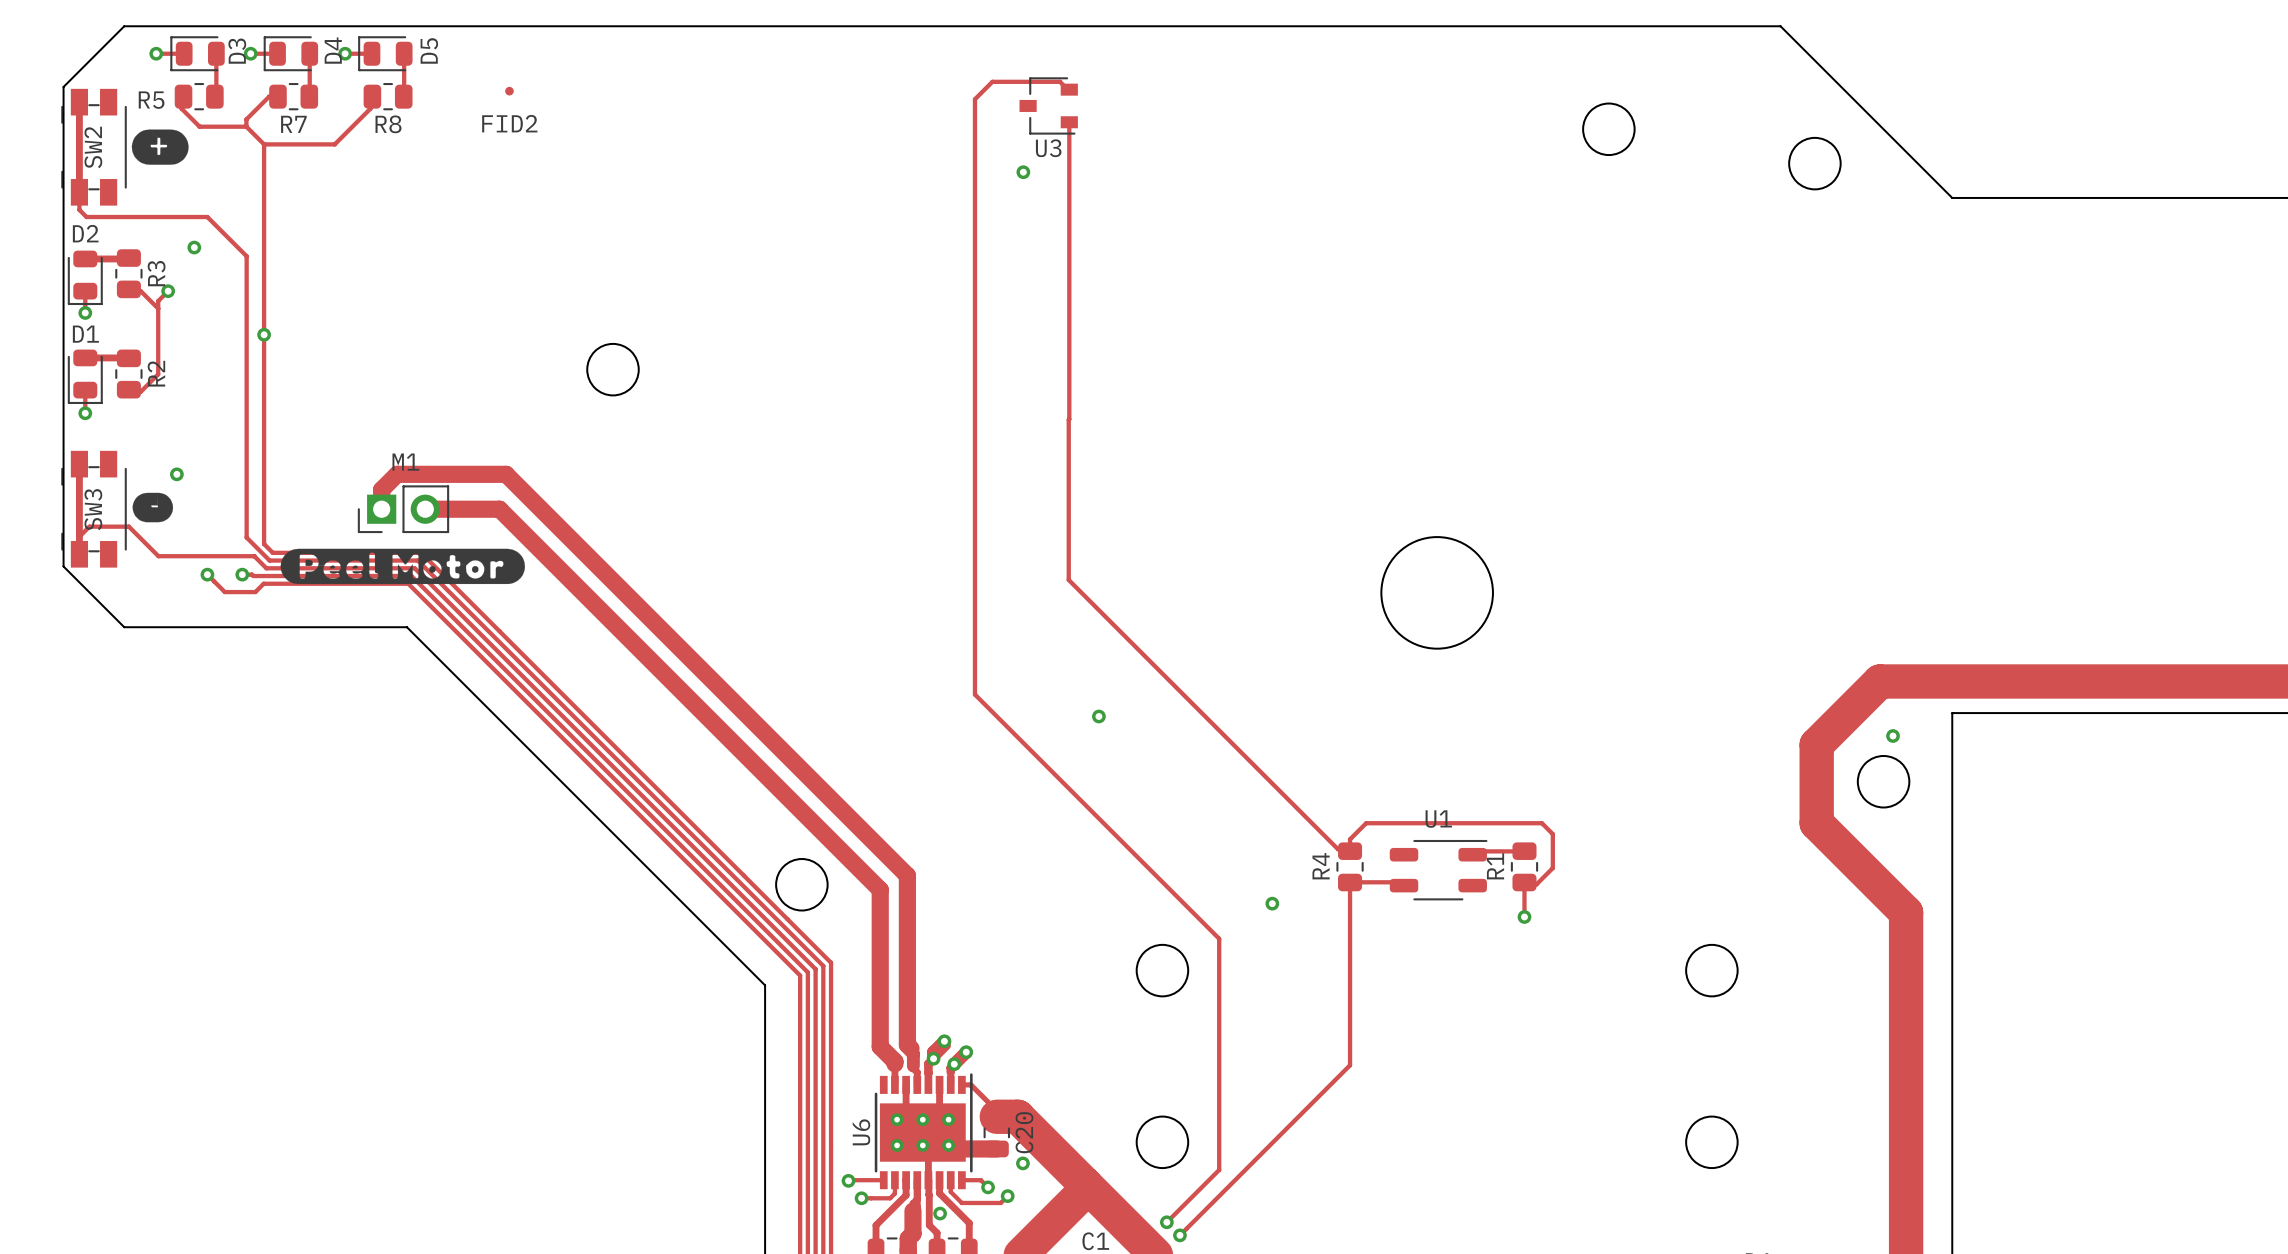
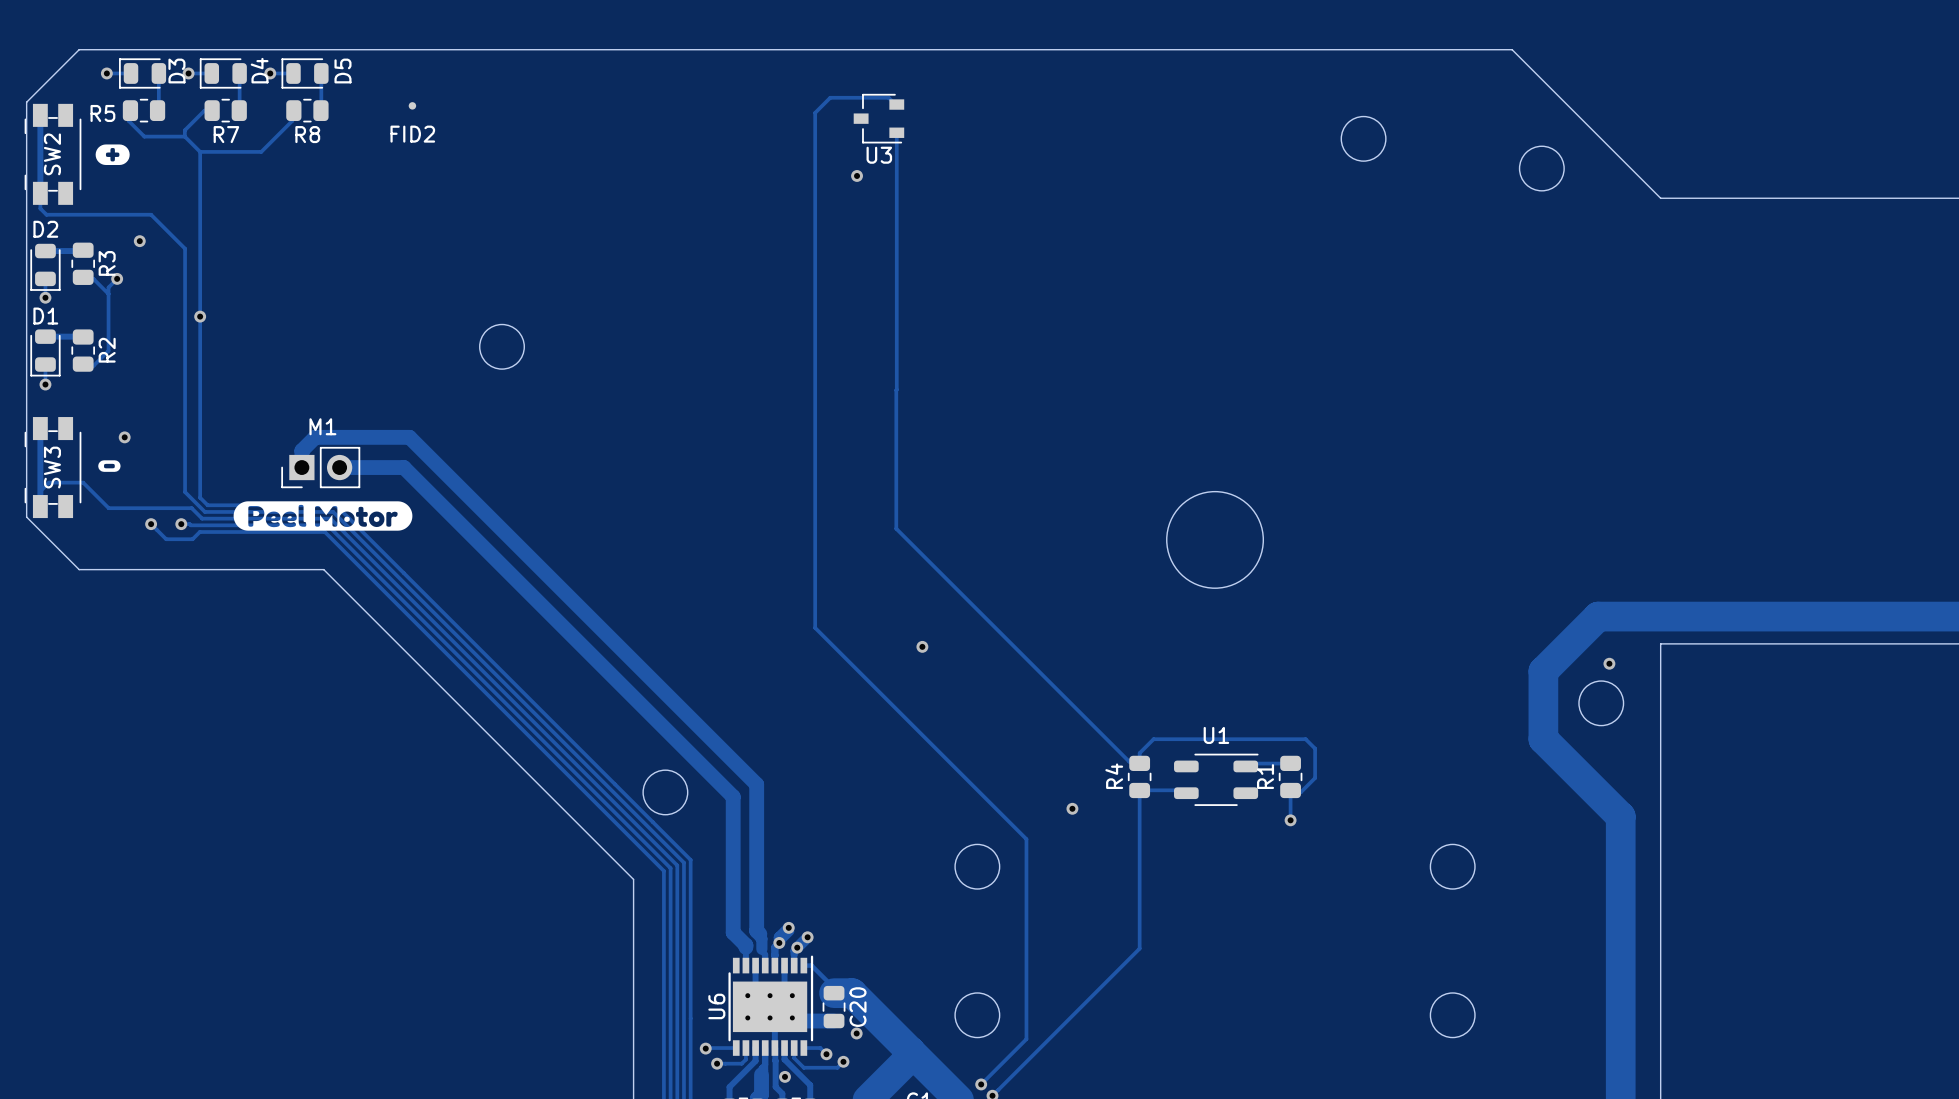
drawing shape: [131, 129, 189, 165] -> [95, 144, 130, 166]
drawing shape: [132, 492, 174, 523] -> [98, 460, 121, 472]
drawing shape: [280, 548, 526, 585] -> [233, 501, 413, 531]

